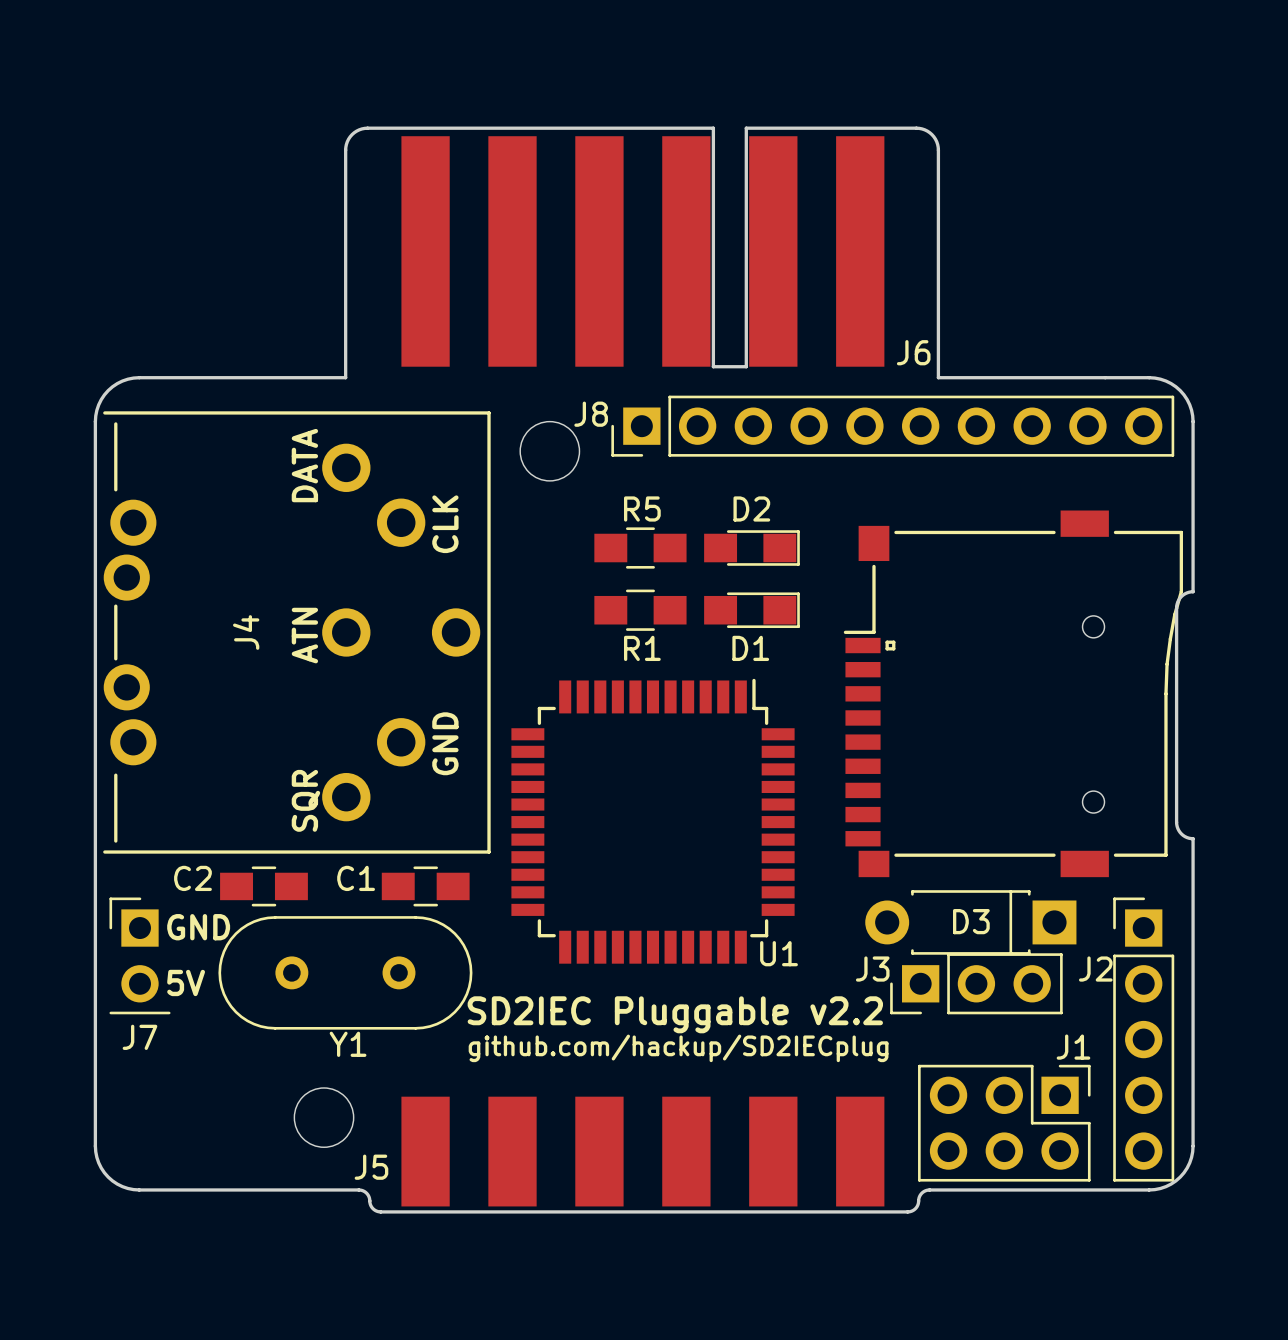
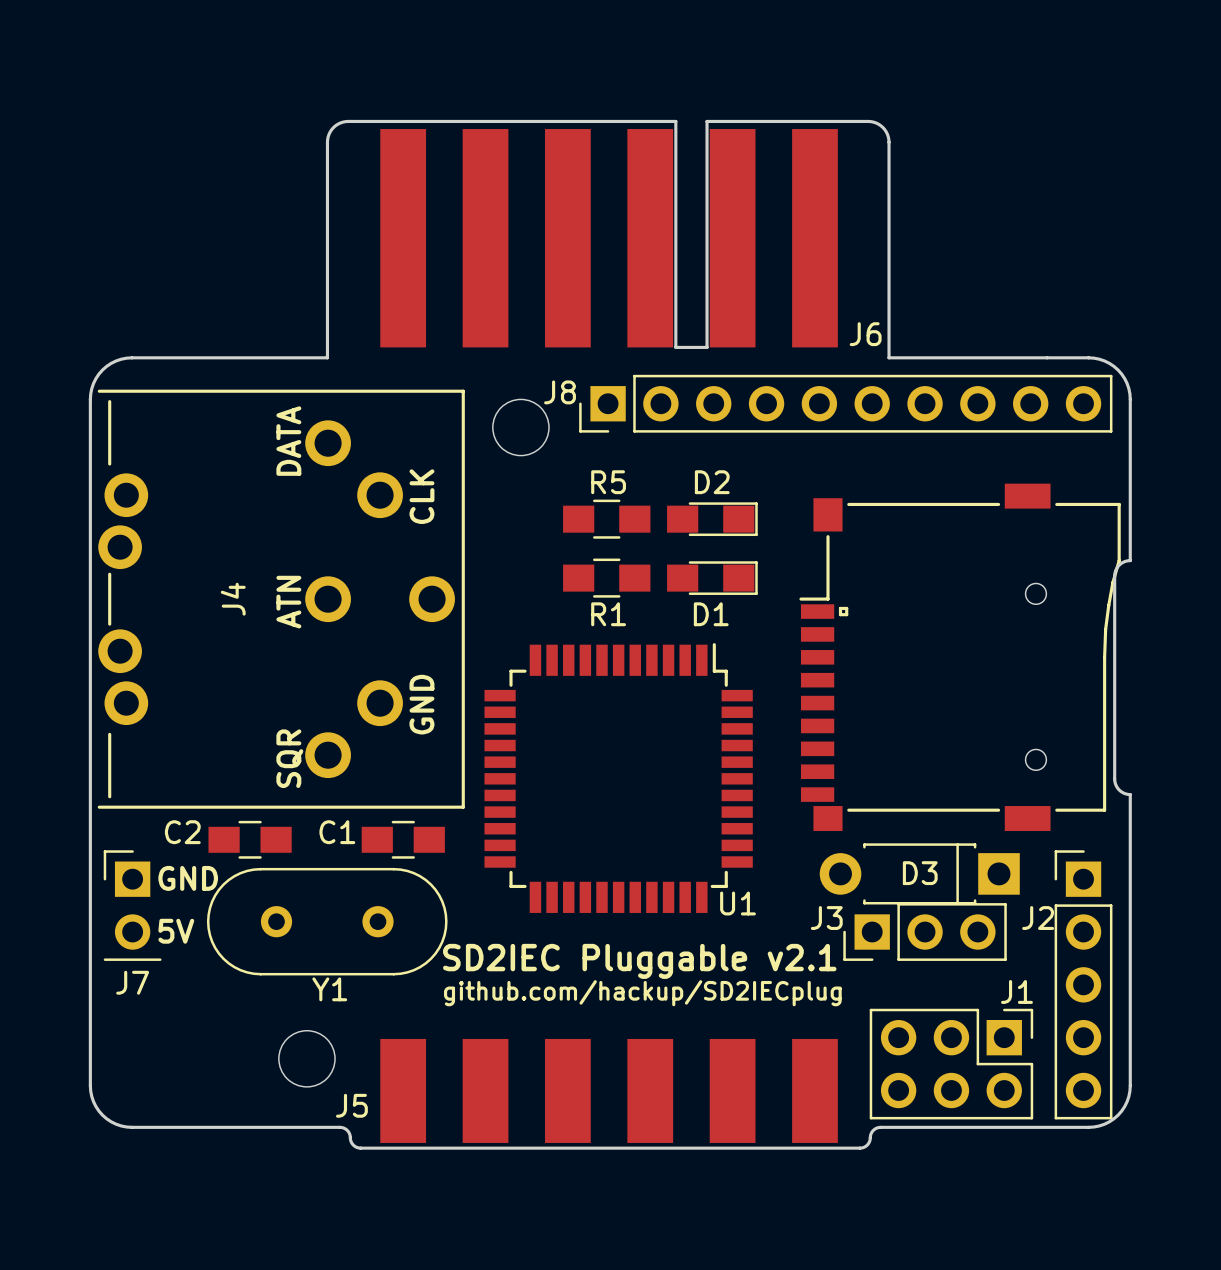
text: SD2IEC Pluggable v2.2 (675, 1014) -> SD2IEC Pluggable v2.1 (639, 961)

